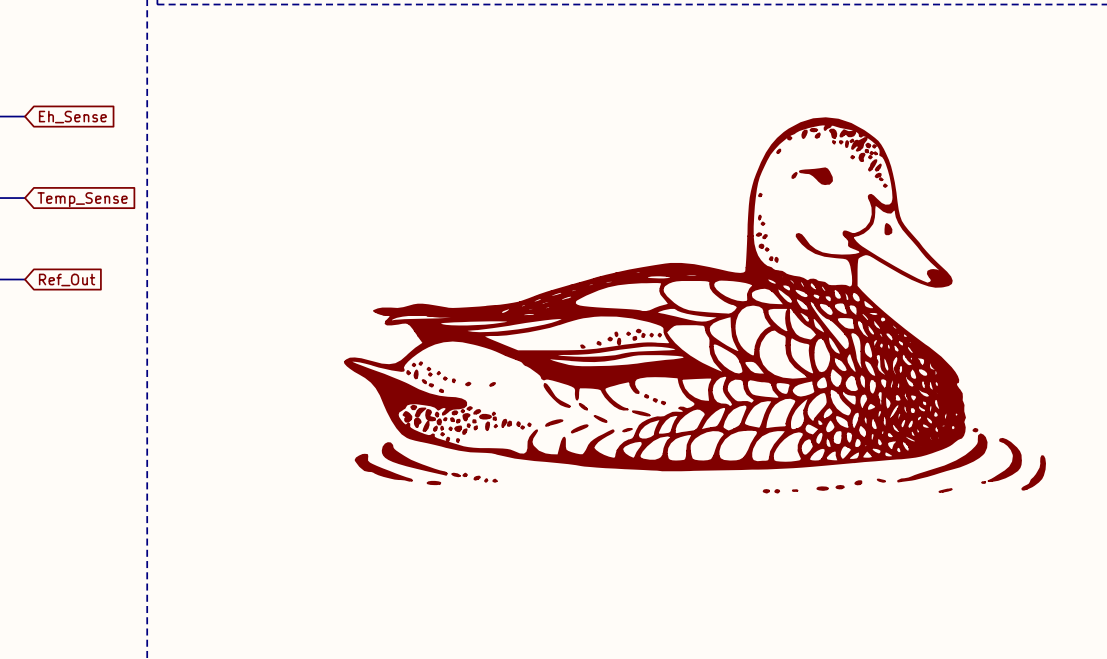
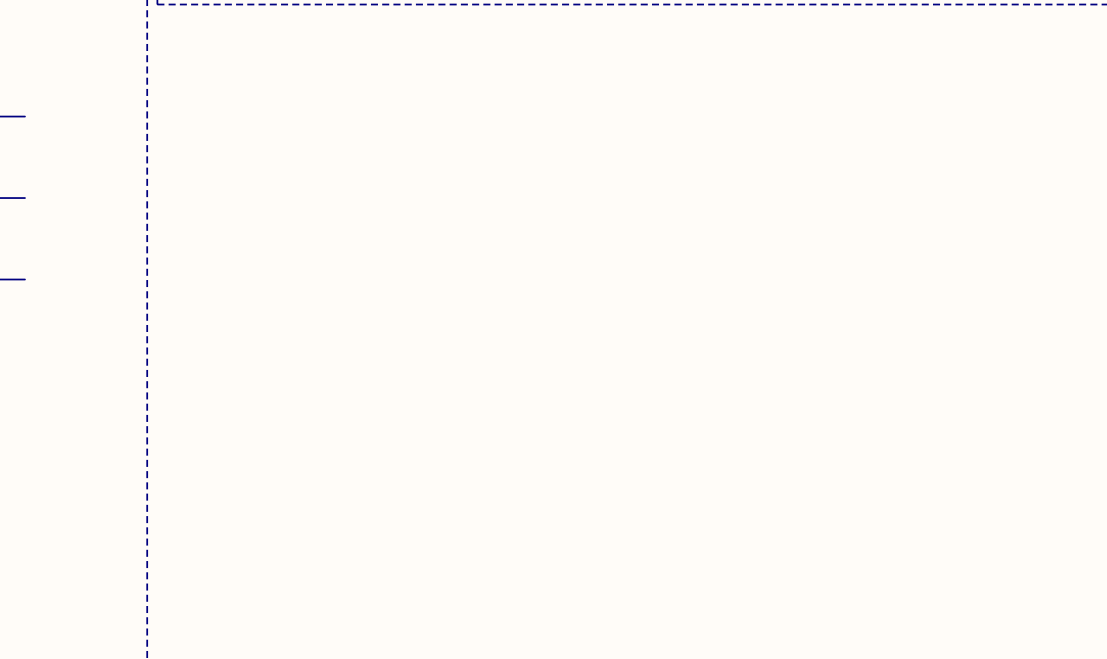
global label: Eh_Sense (72, 117) -> none
drawing: [344, 118, 1046, 493] -> none
global label: Temp_Sense (82, 199) -> none
global label: Ref_Out (67, 279) -> none

